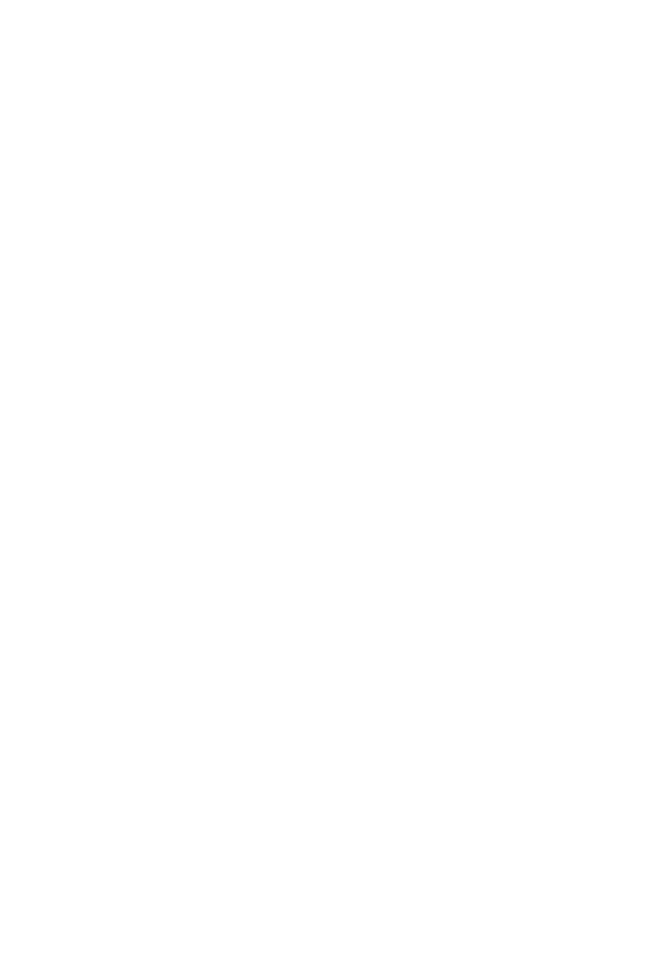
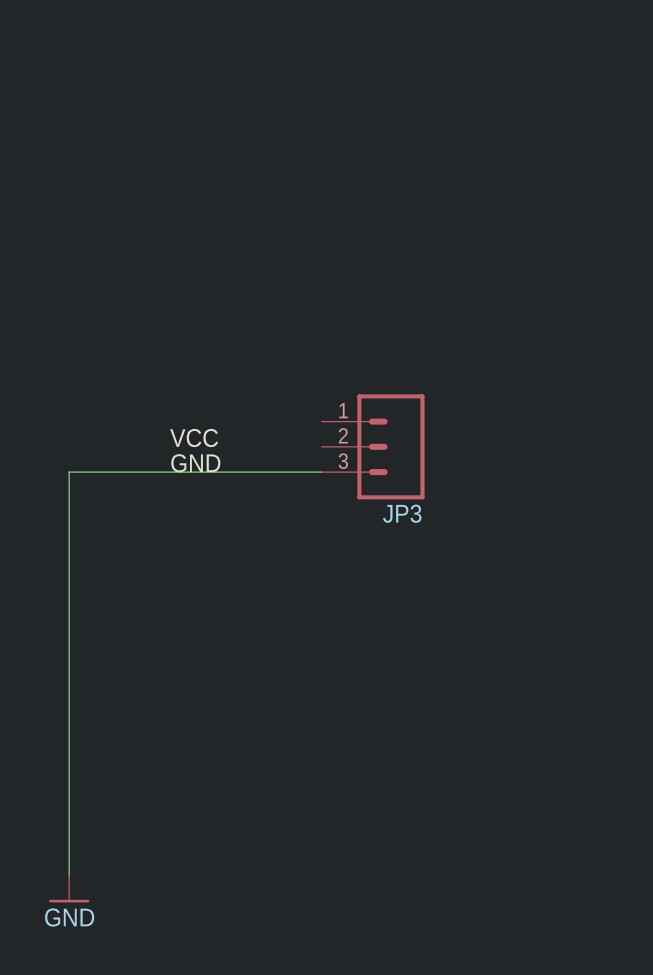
label: none -> VCC (194, 438)
JP3: none -> (373, 446)
label: none -> GND (195, 463)
wire: none -> (321, 472) (69, 472) (69, 875)
power symbol: none -> GND (69, 889)

